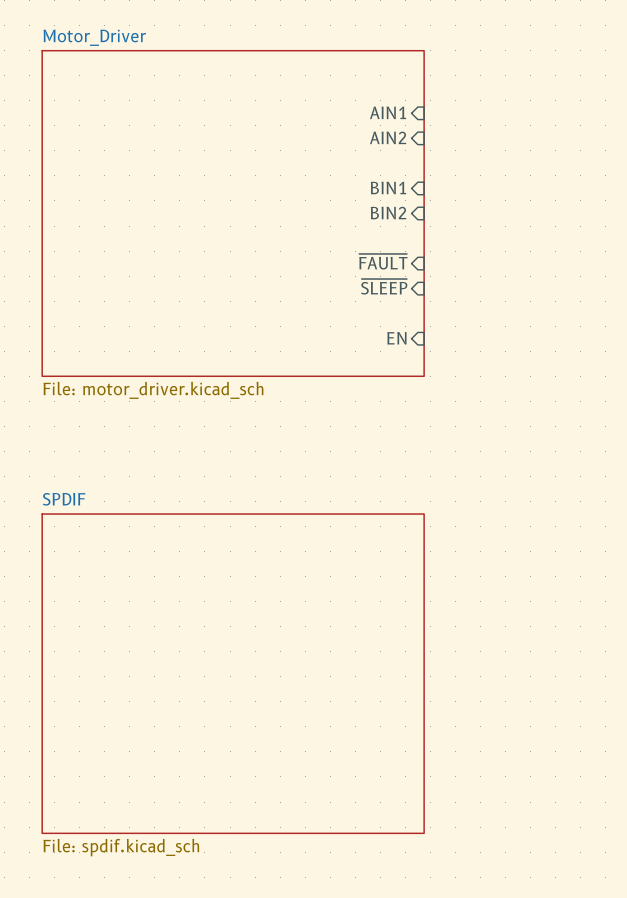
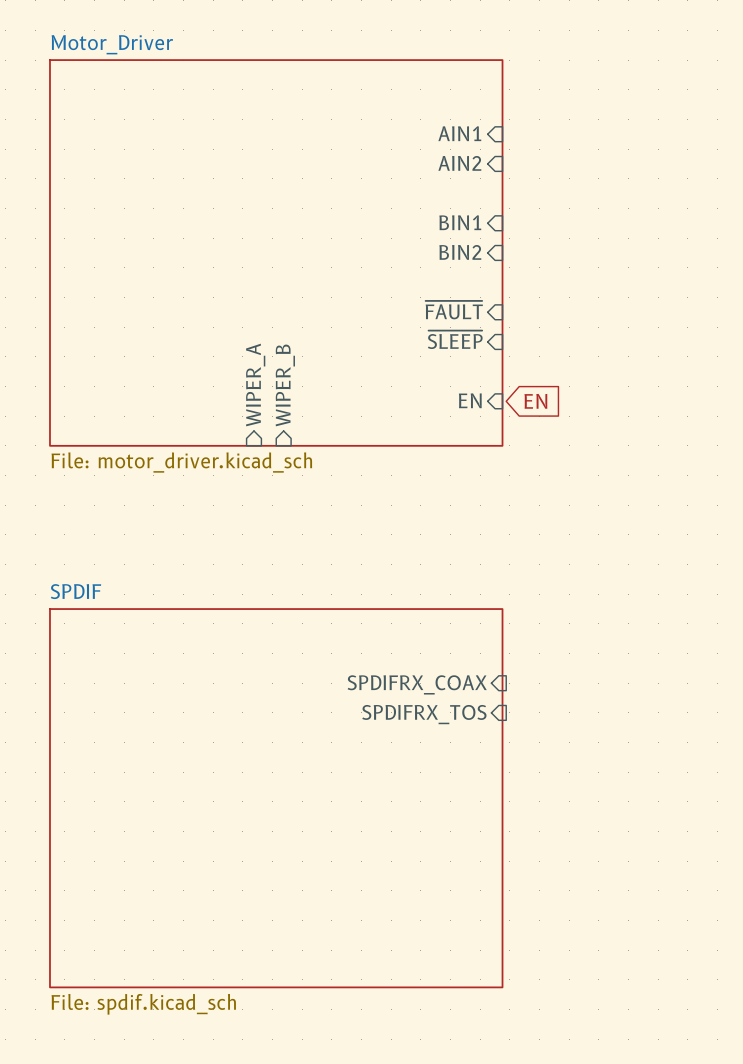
sheet pin: none -> WIPER_A (255, 385)
sheet pin: none -> WIPER_B (285, 385)
global label: none -> EN (535, 401)
sheet pin: none -> SPDIFRX_COAX (417, 684)
sheet pin: none -> SPDIFRX_TOS (424, 714)

